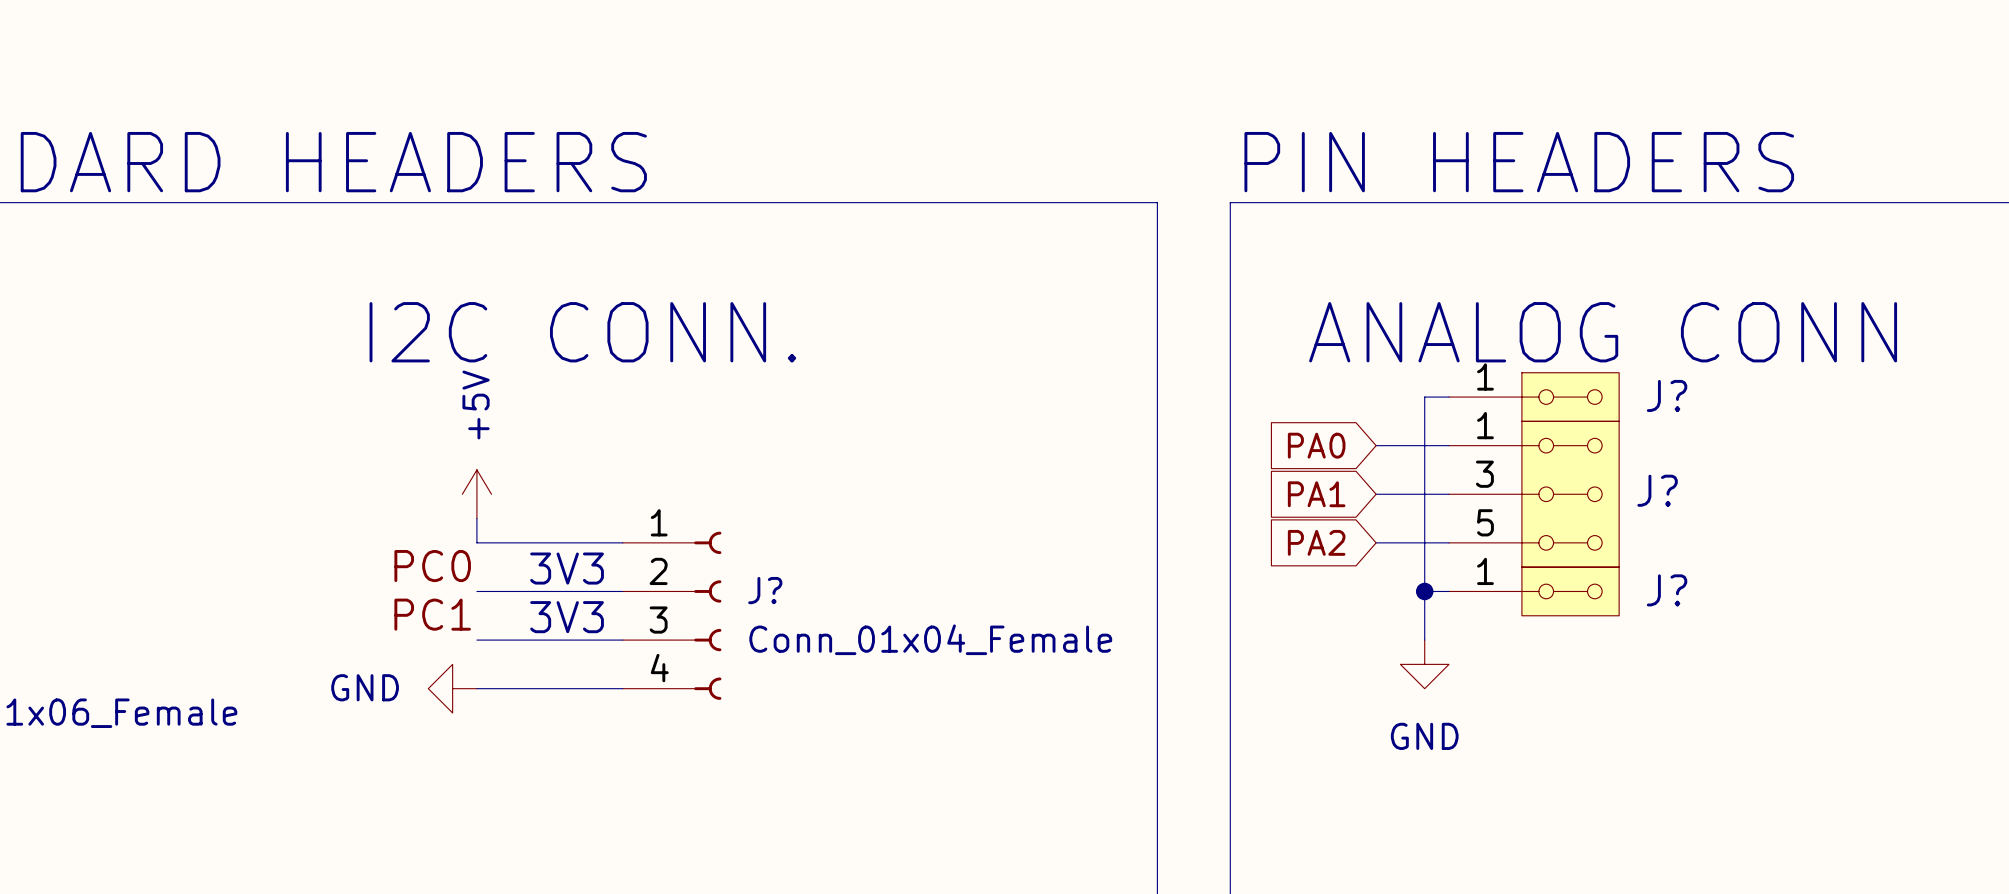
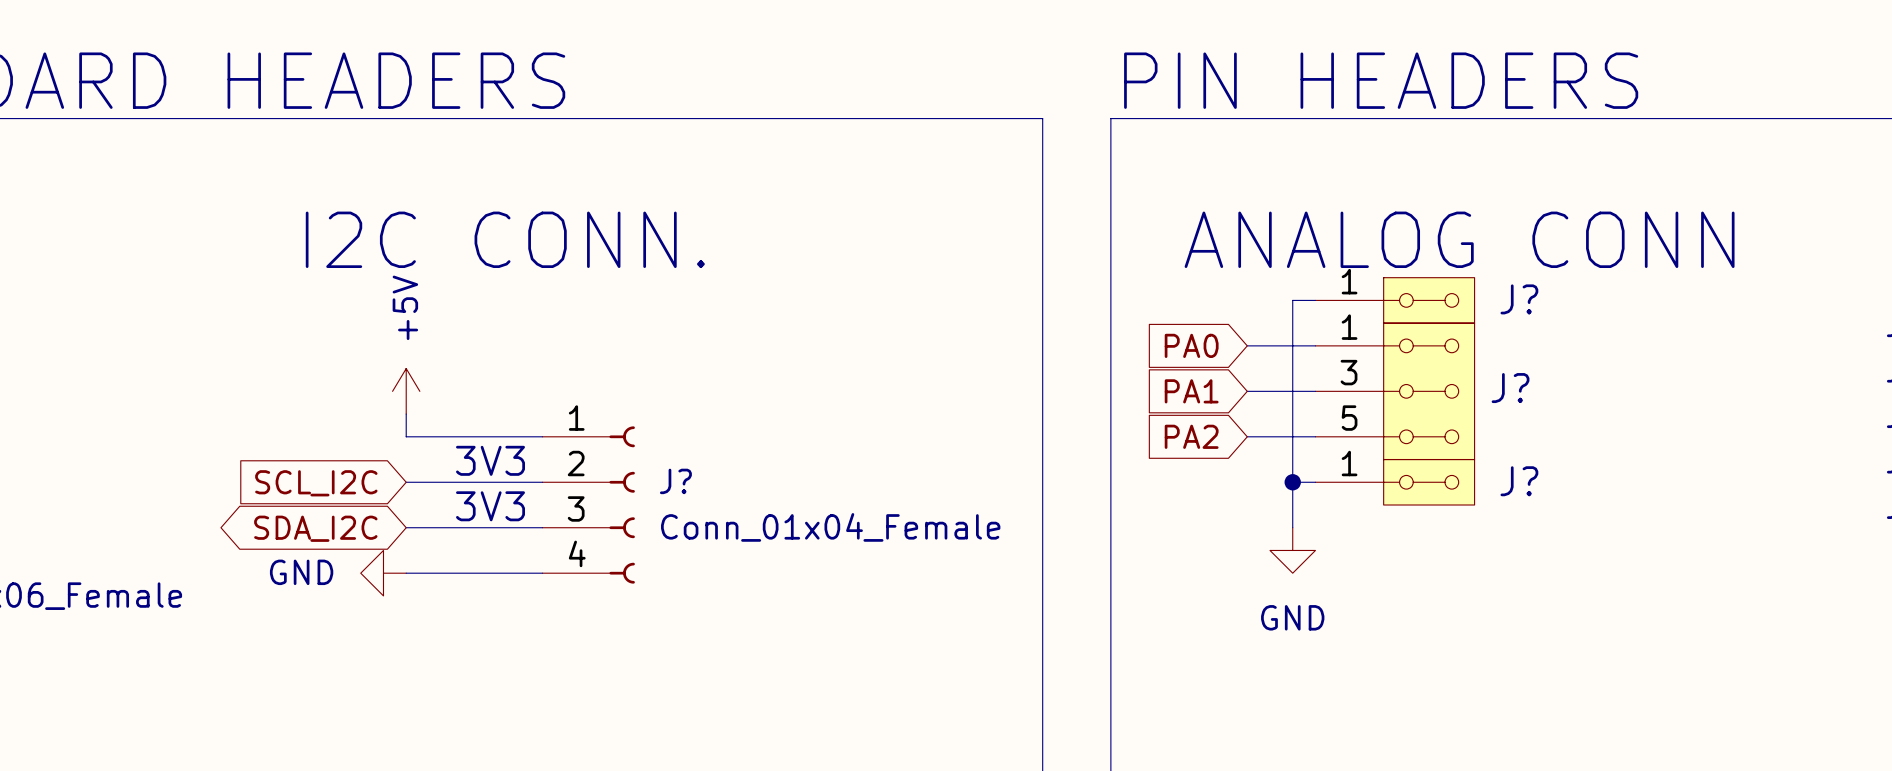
label: PC0 (432, 566) -> none
global label: none -> SCL_I2C (316, 483)
label: PC1 (432, 614) -> none
global label: none -> SDA_I2C (315, 528)

